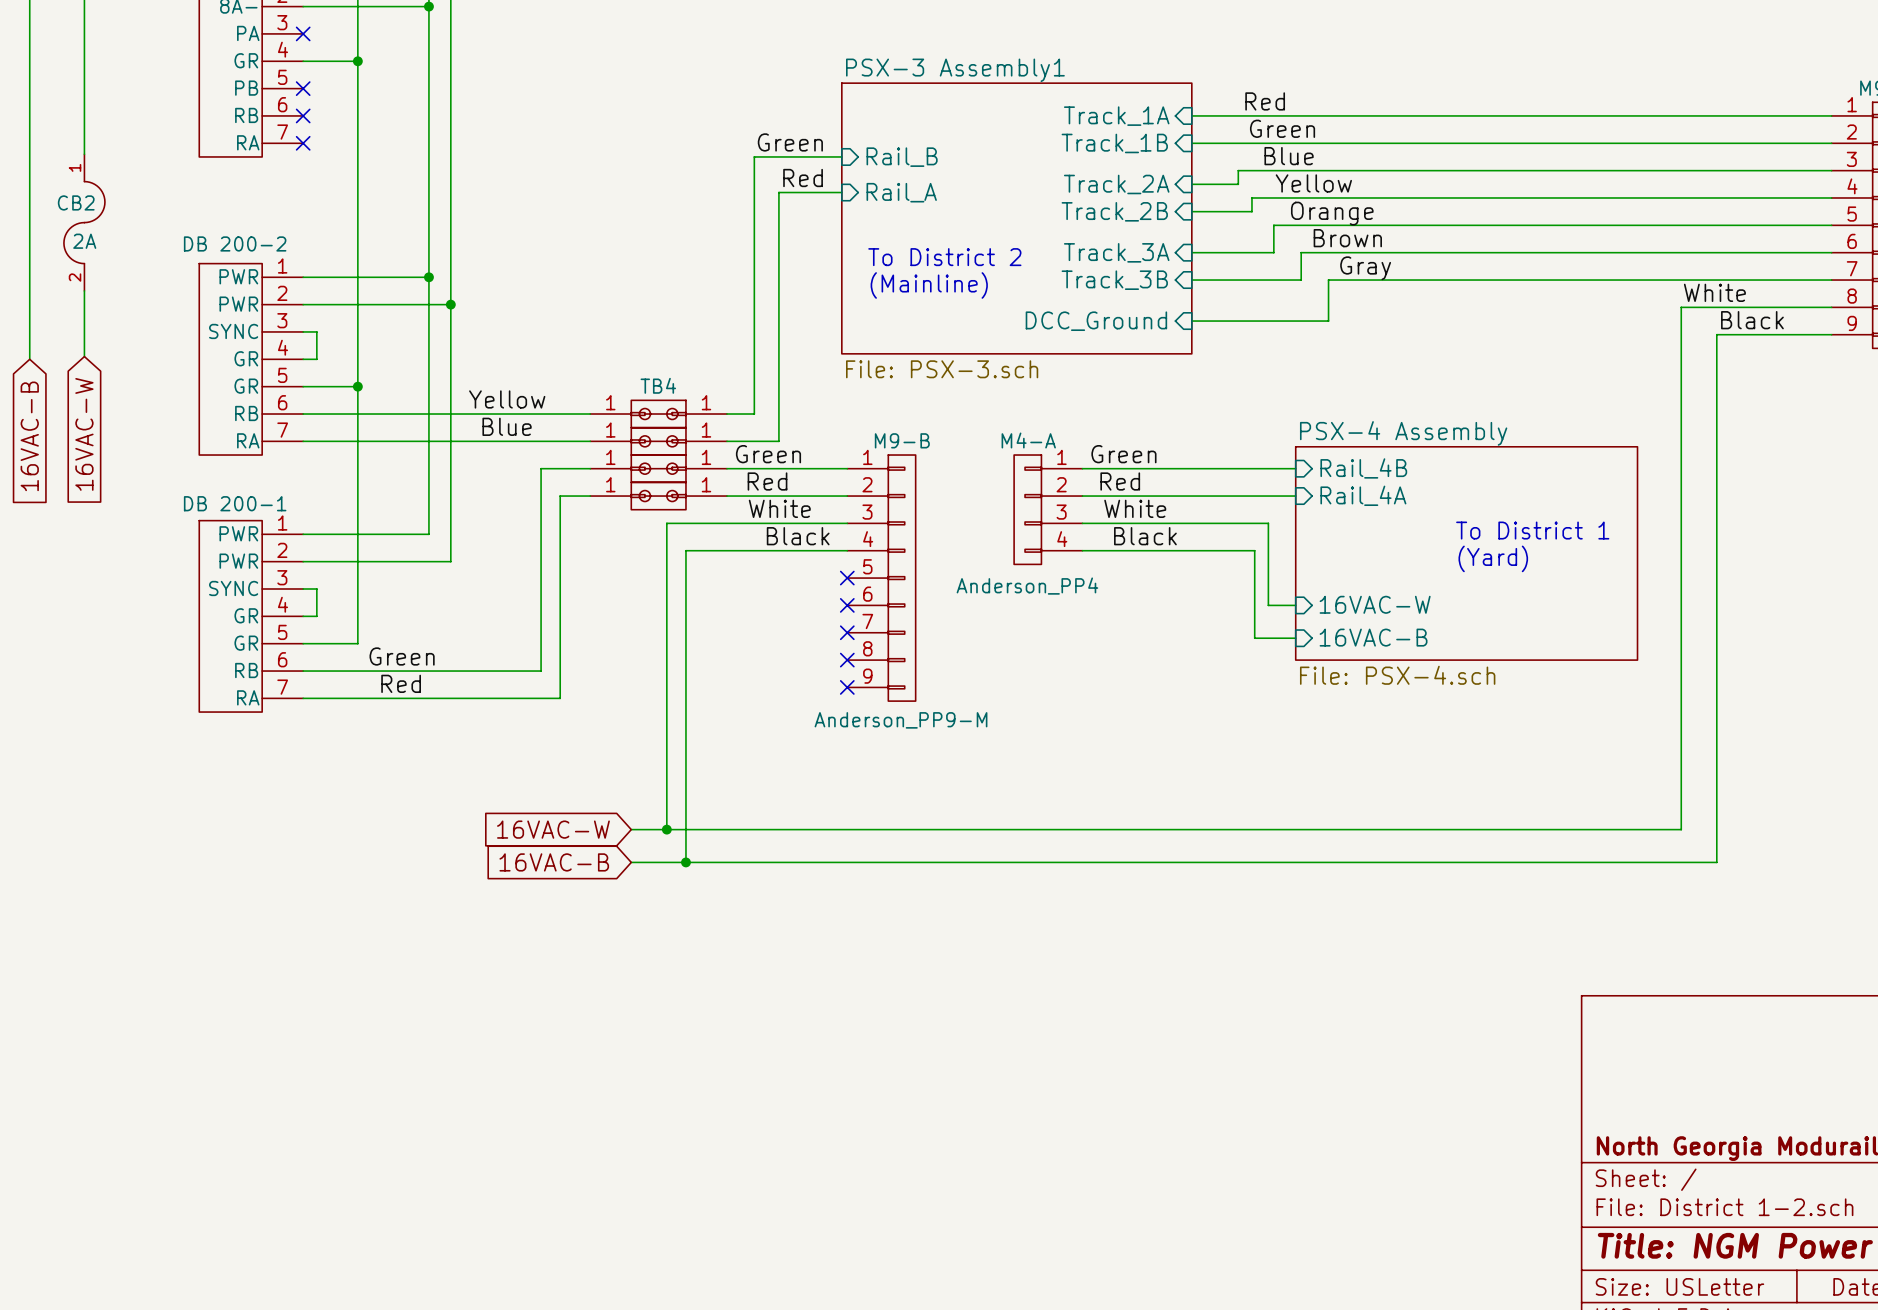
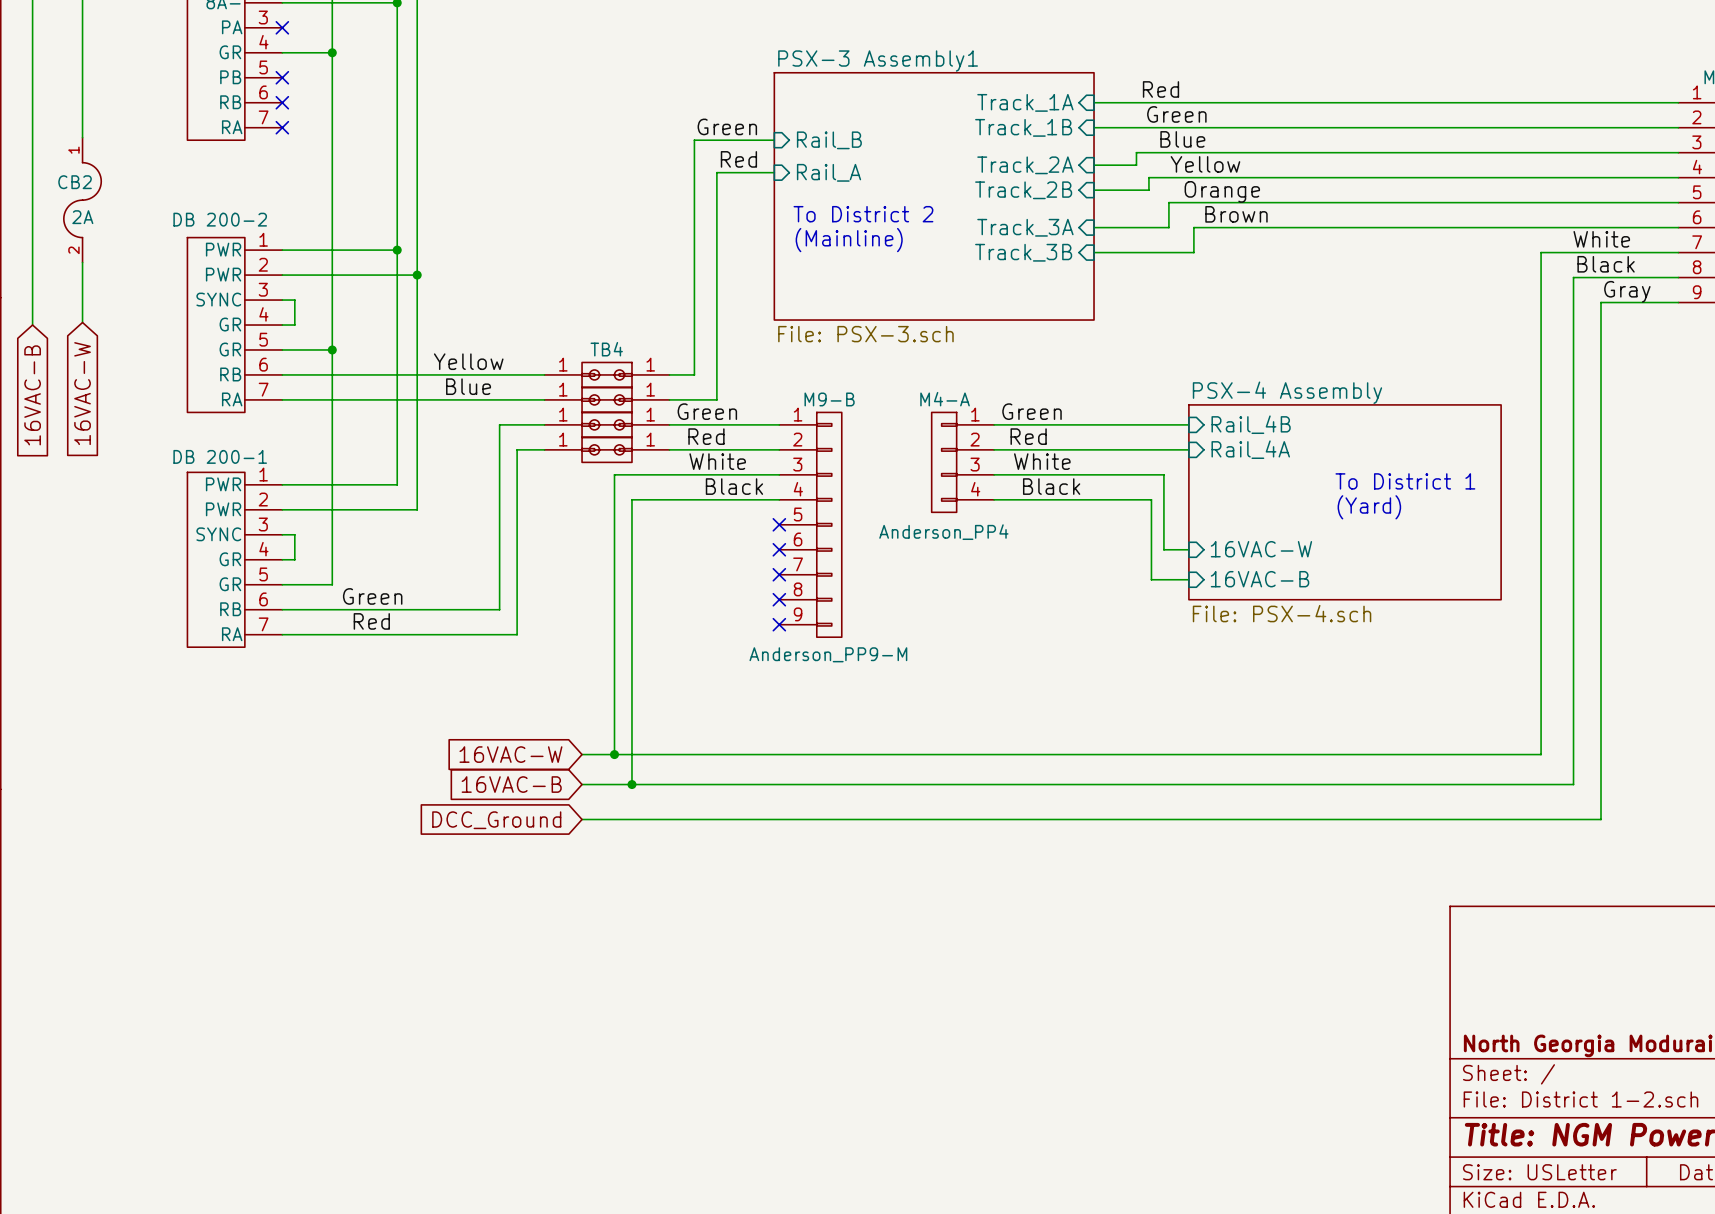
text position: To District 2 (944, 257) -> To District 2 (863, 214)
label: Gray (1365, 268) -> none
wire: (1681, 280) (1328, 280) (1328, 321) (1191, 321) -> none
text position: (Mainline) (929, 285) -> (Mainline) (849, 240)
label position: White (1714, 292) -> White (1601, 239)
wire: (1681, 307) (1716, 307) -> (1541, 277) (1541, 252)
label position: Black (1752, 320) -> Black (1606, 264)
sheet pin: DCC_Ground (1096, 321) -> none
label: none -> Gray (1627, 291)
wire: (1716, 334) (1746, 334) -> (1573, 302) (1573, 277)
wire: none -> (1601, 302) (1601, 819) (582, 819)
global label: none -> DCC_Ground (496, 820)

